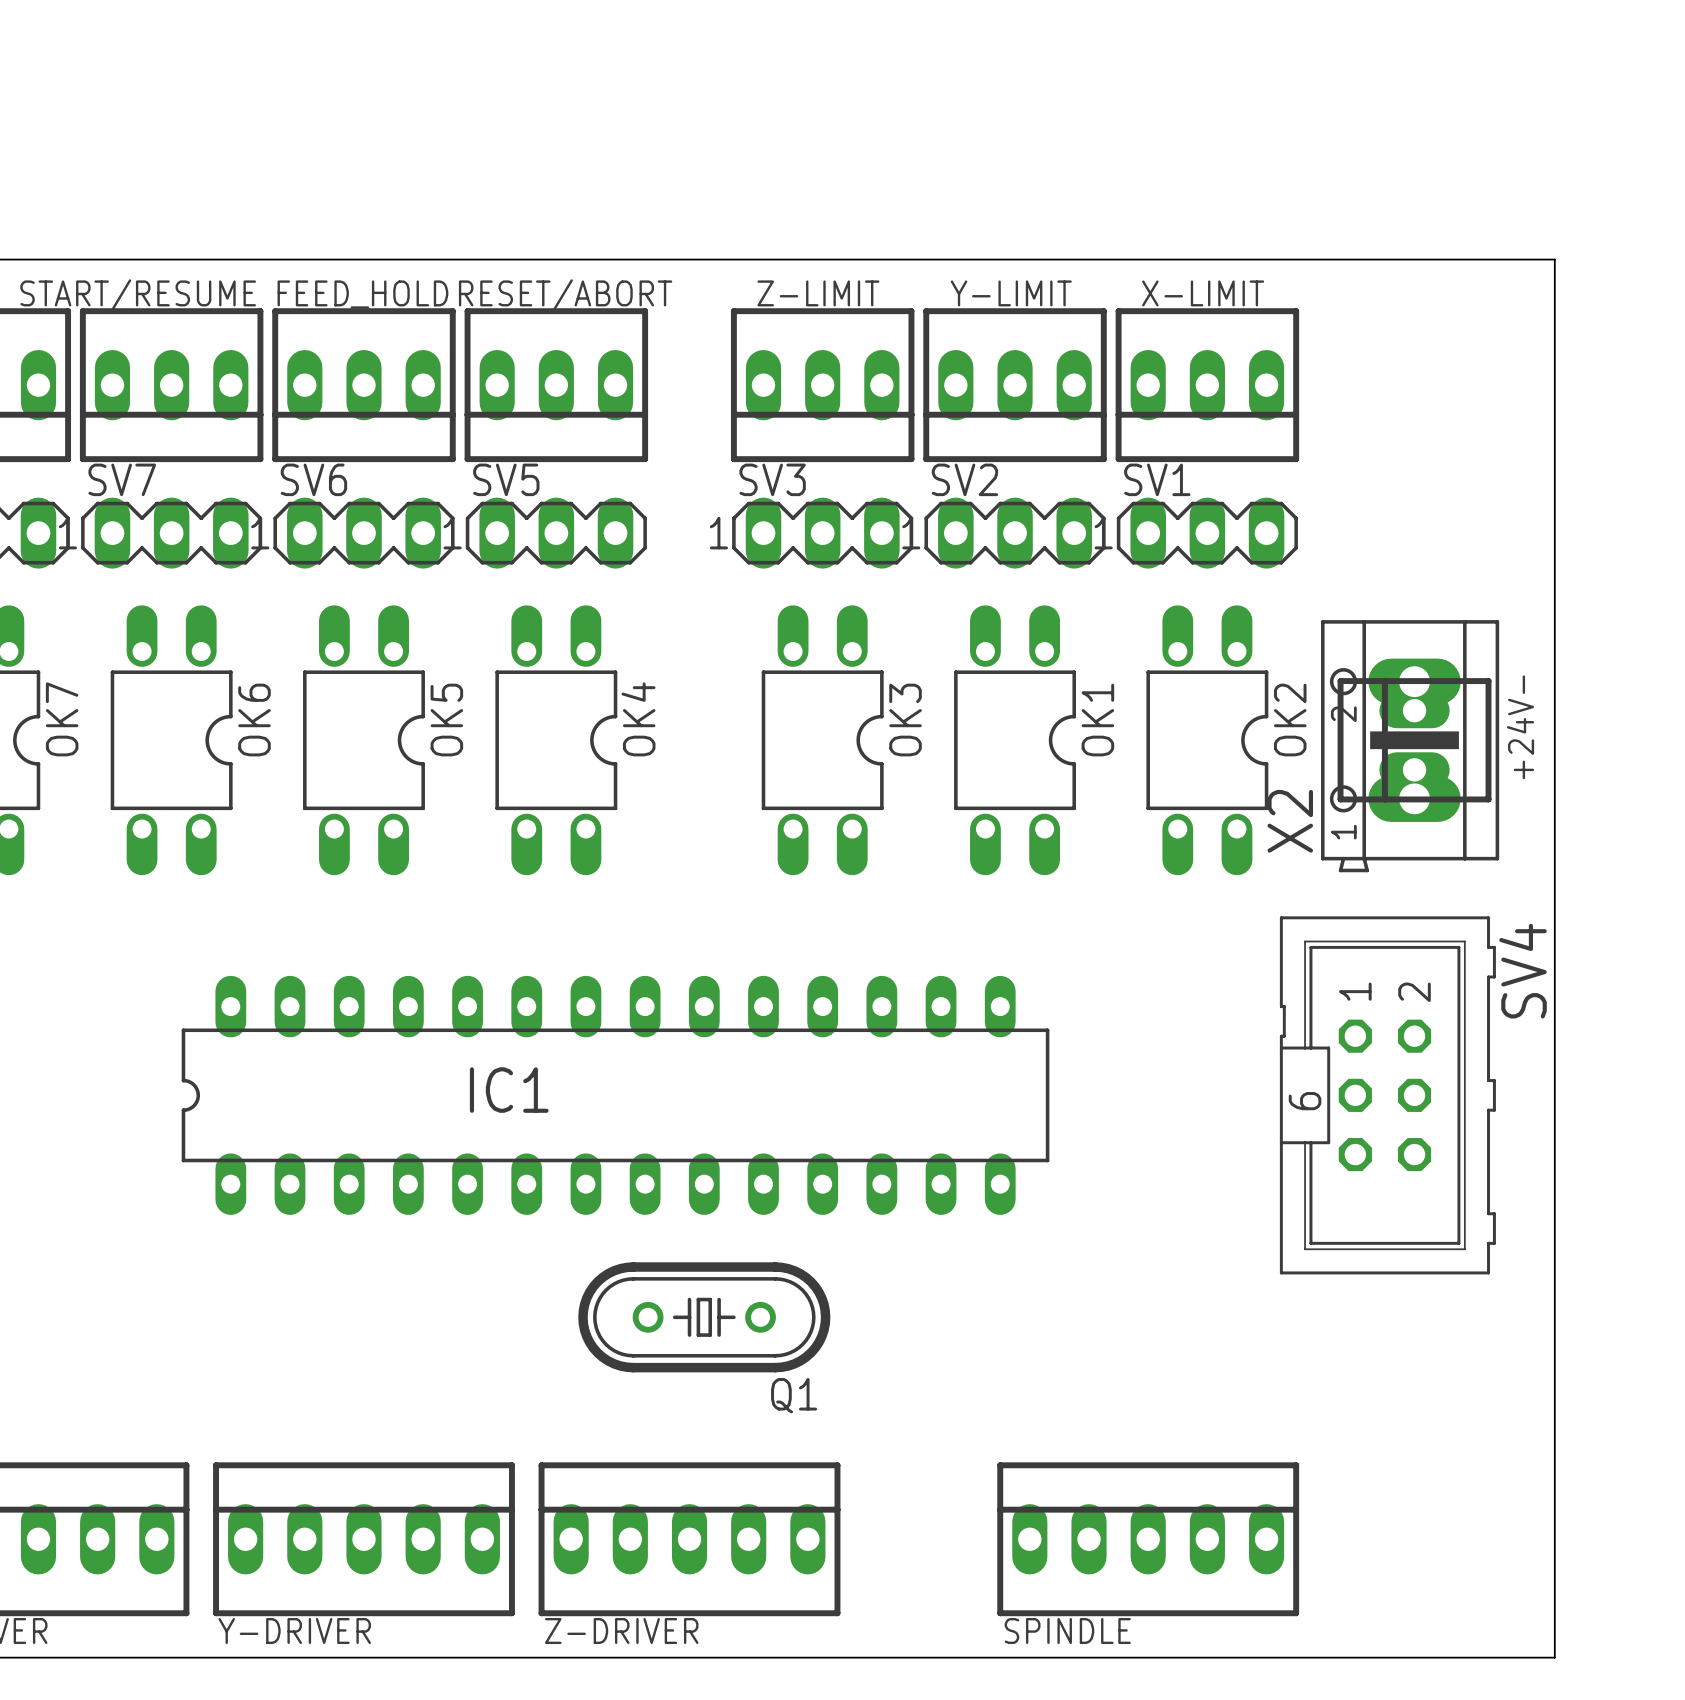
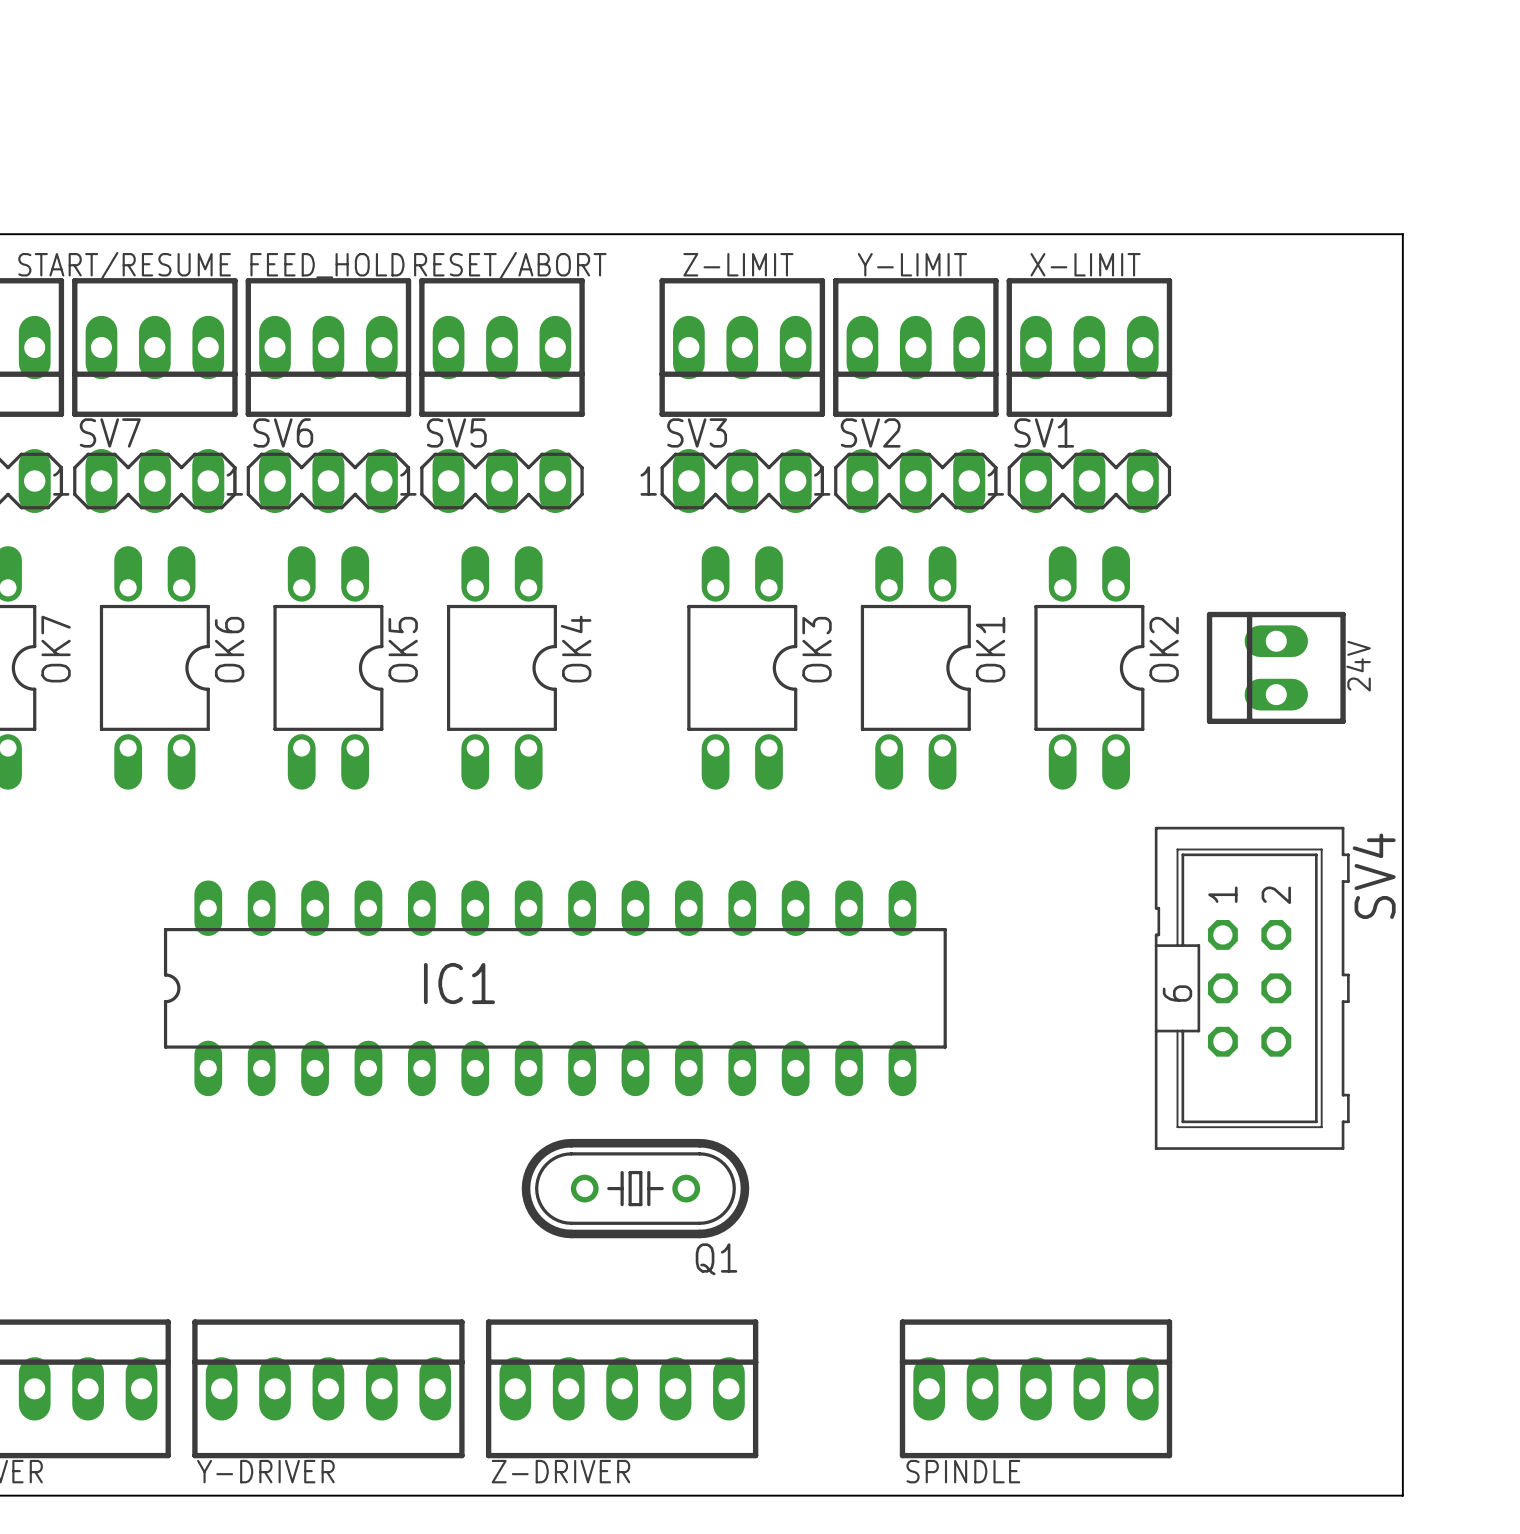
+24V- name: +24V- (1520, 727) -> 24V (1358, 666)
X2: (1410, 746) -> none

